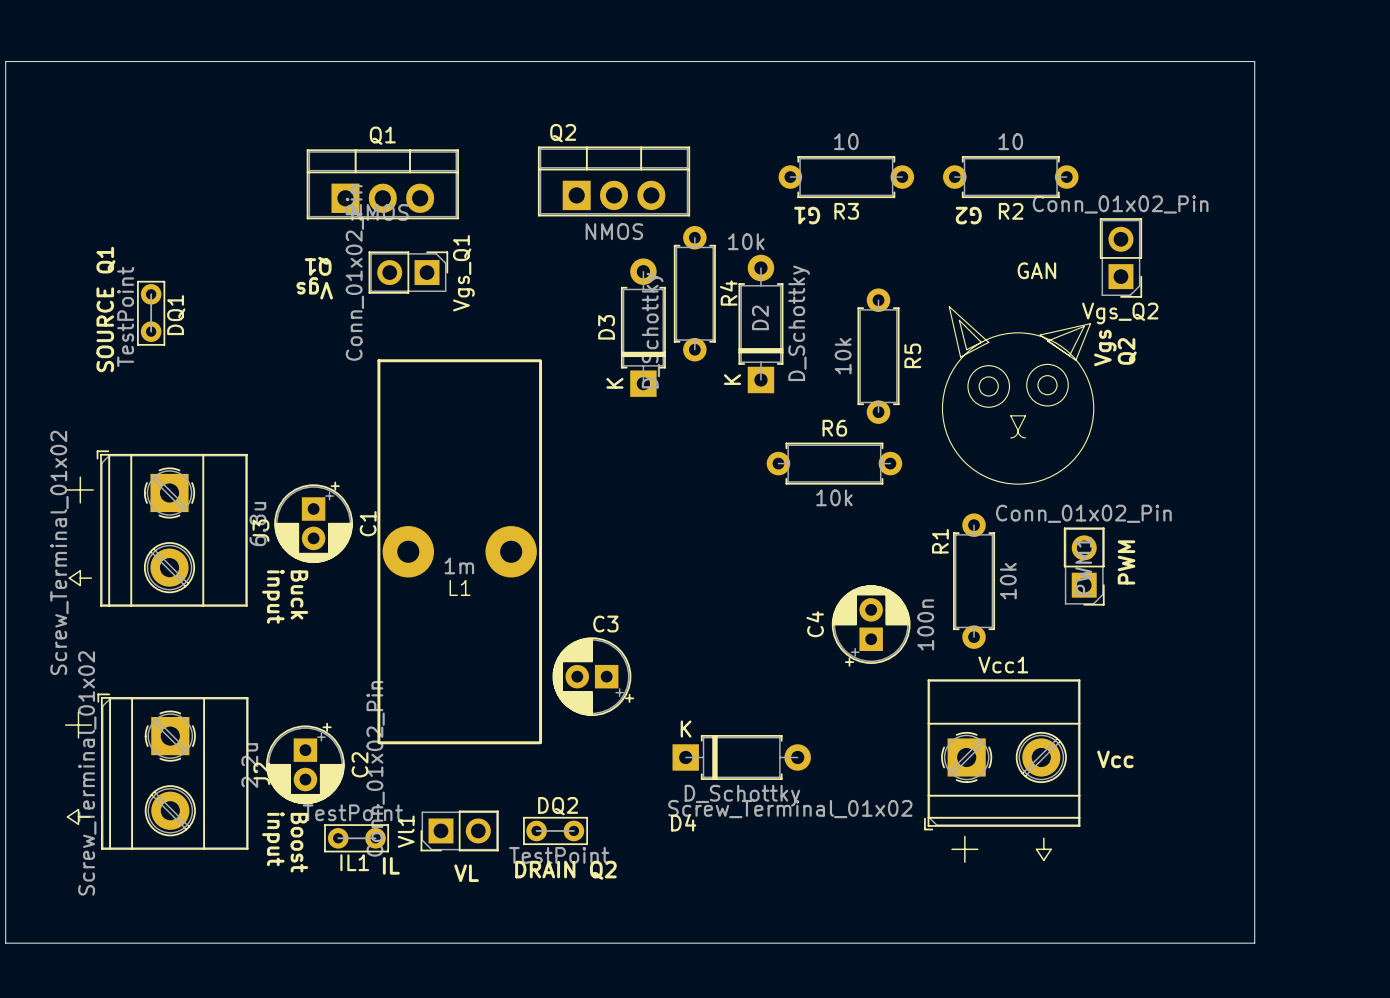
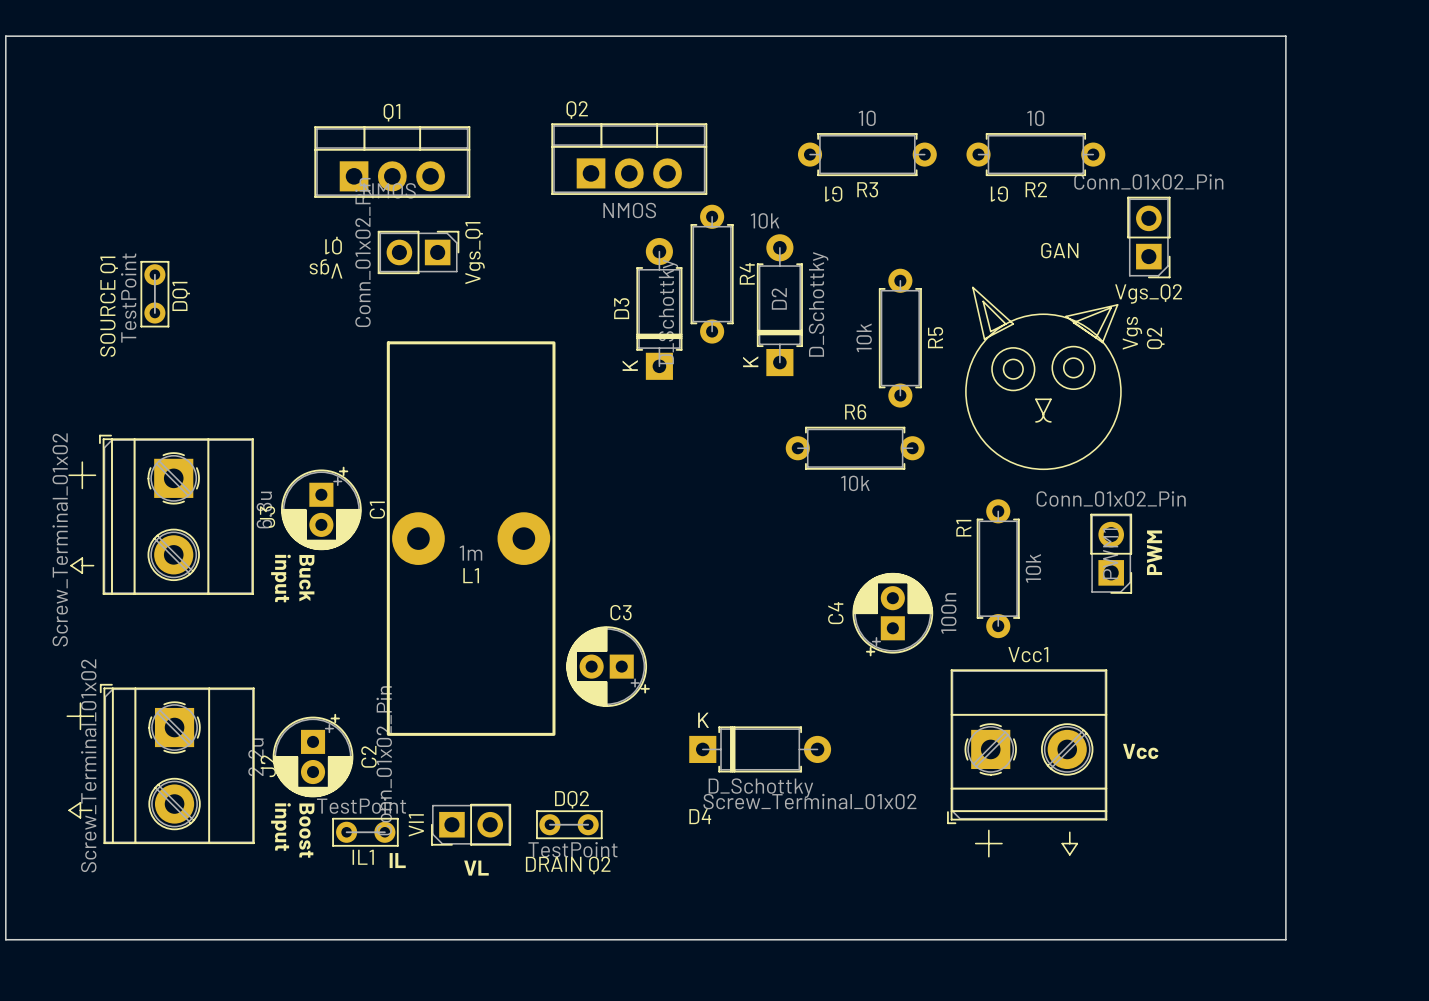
text: G2 (968, 215) -> G1 (999, 194)

